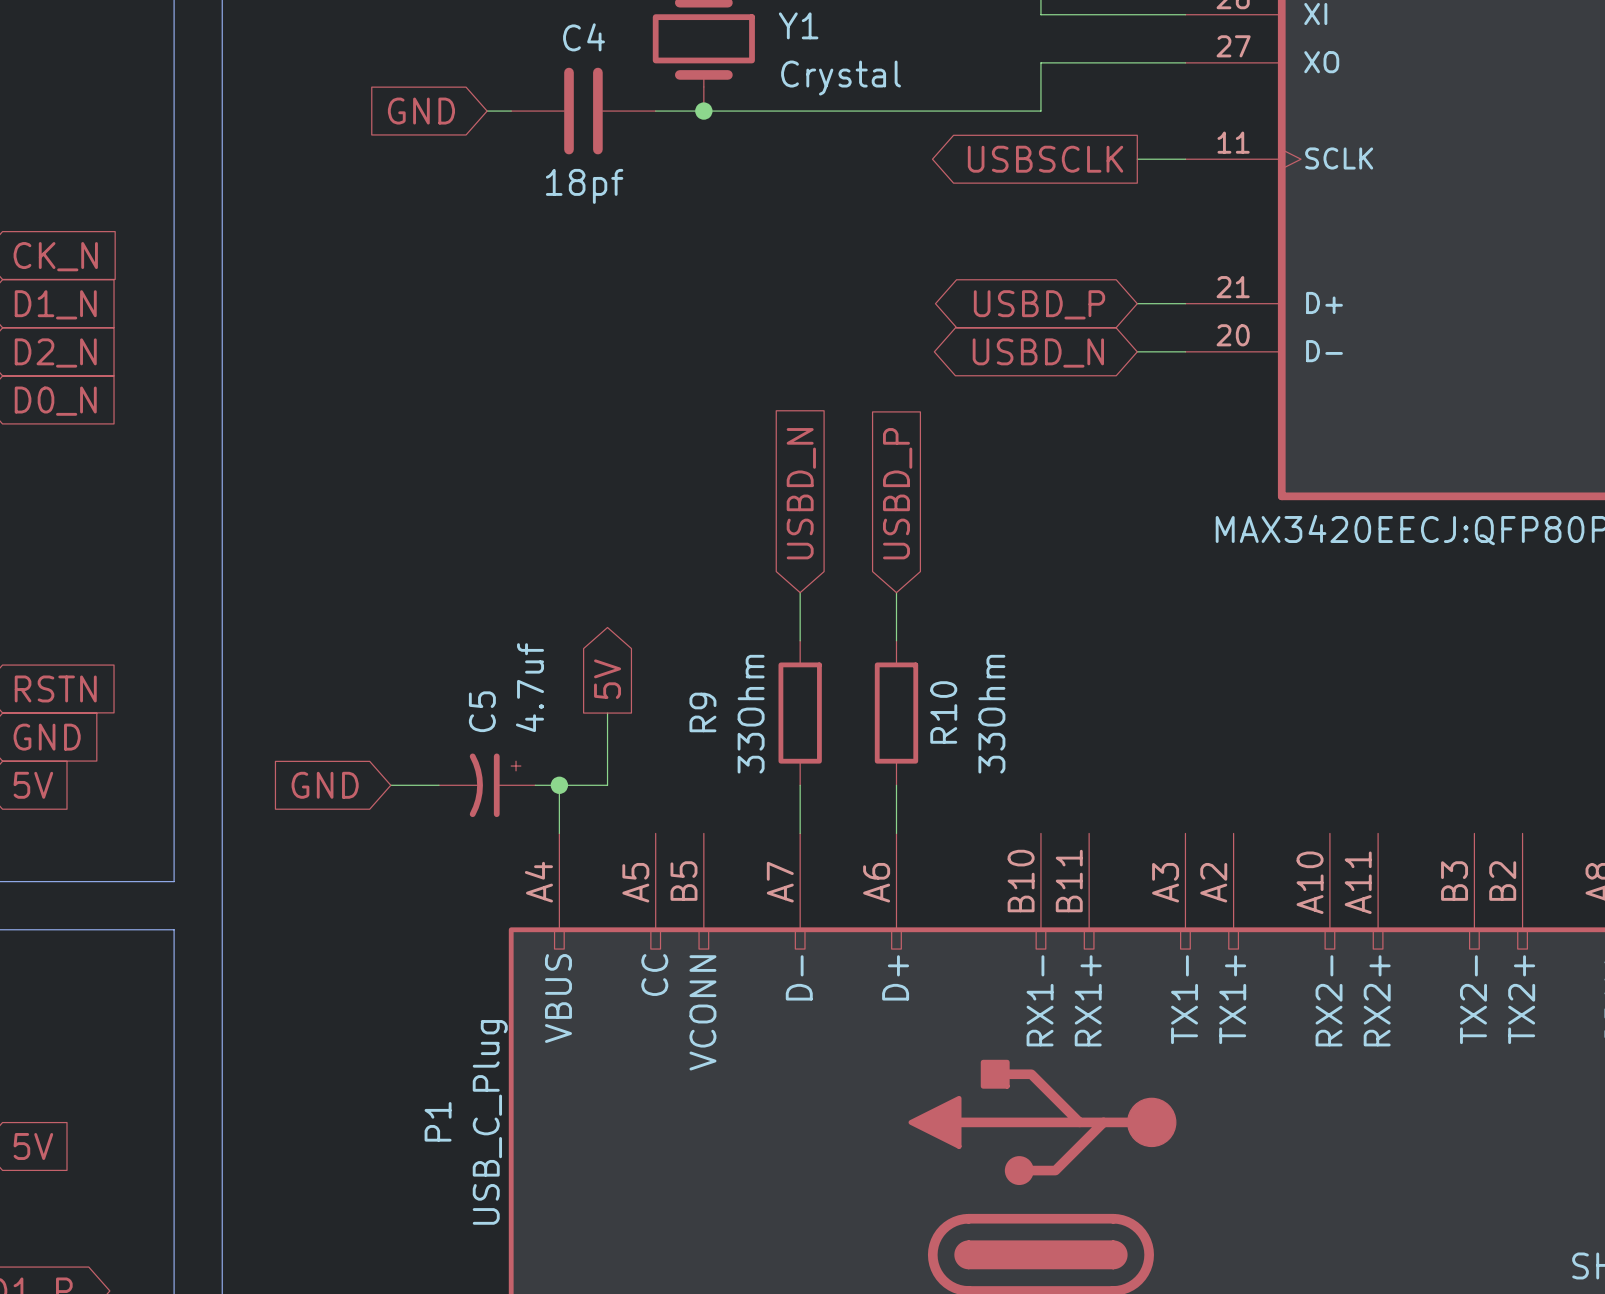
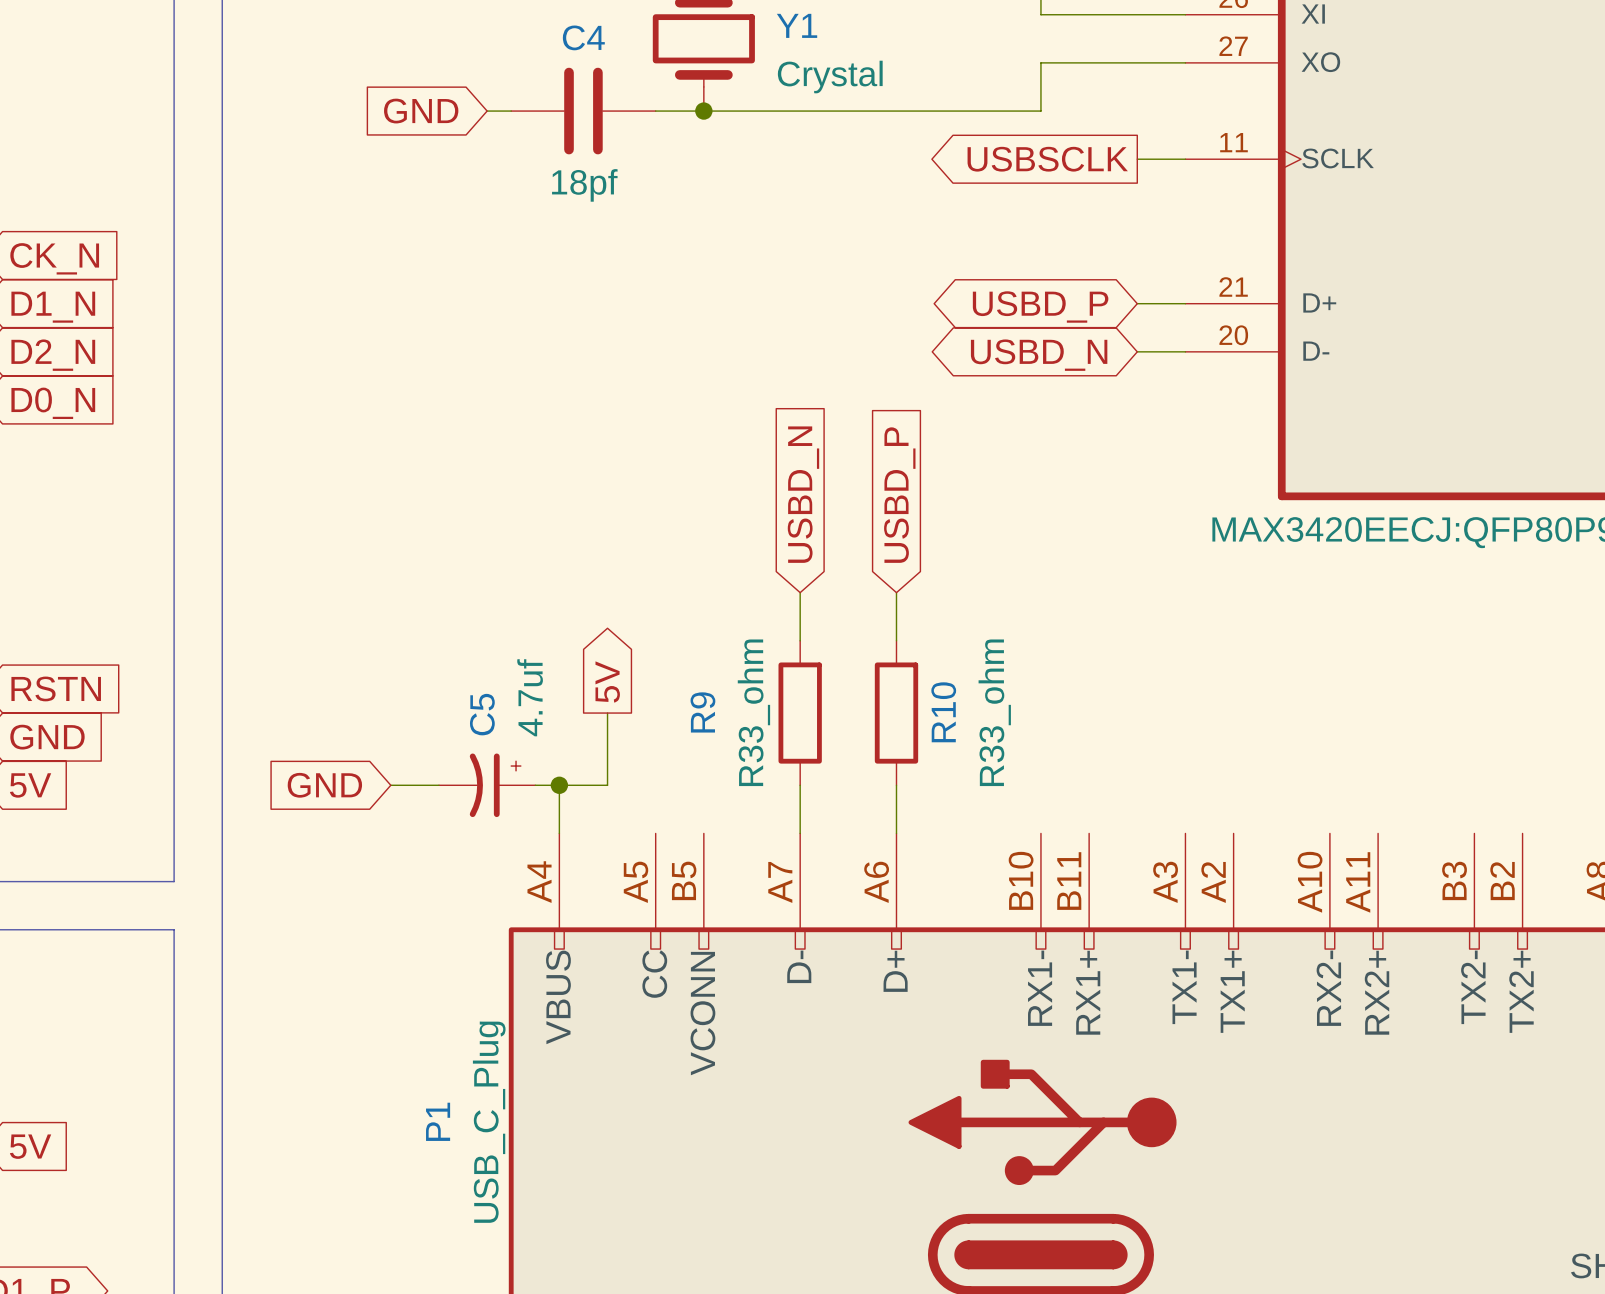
R9 value: 33Ohm (751, 714) -> R33_ohm (753, 712)
R10 value: 33Ohm (991, 714) -> R33_ohm (994, 712)

